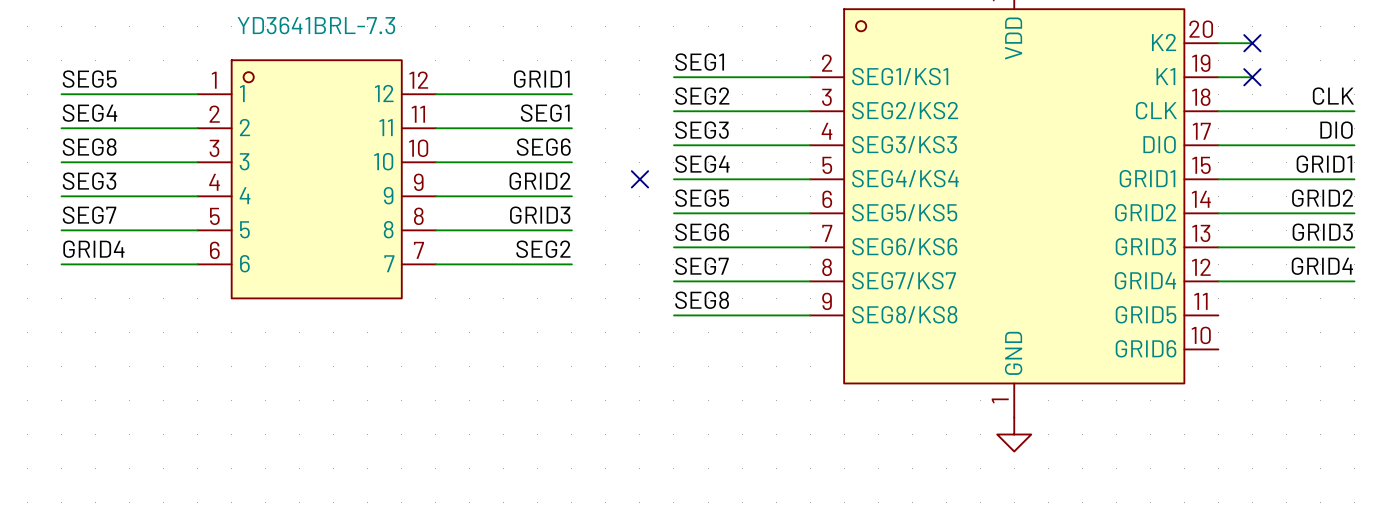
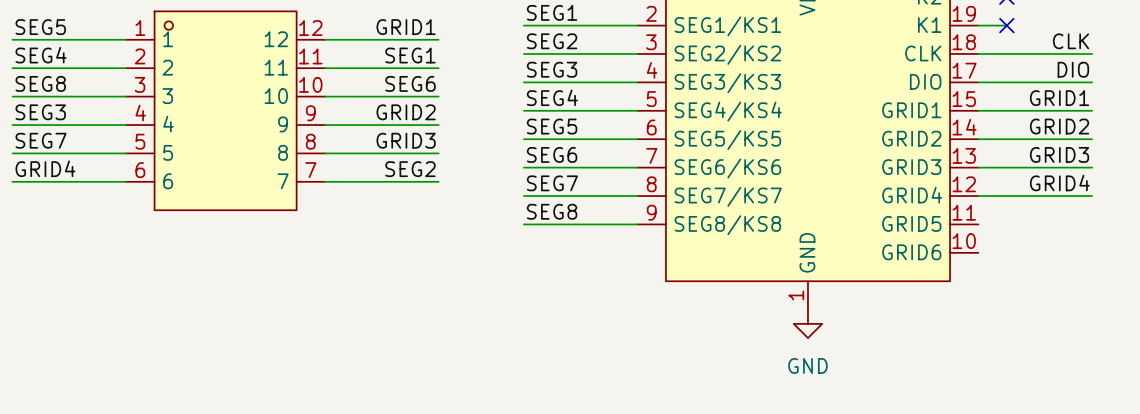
no-connect mark: (639, 179) -> none
power symbol text: none -> GND (807, 365)

